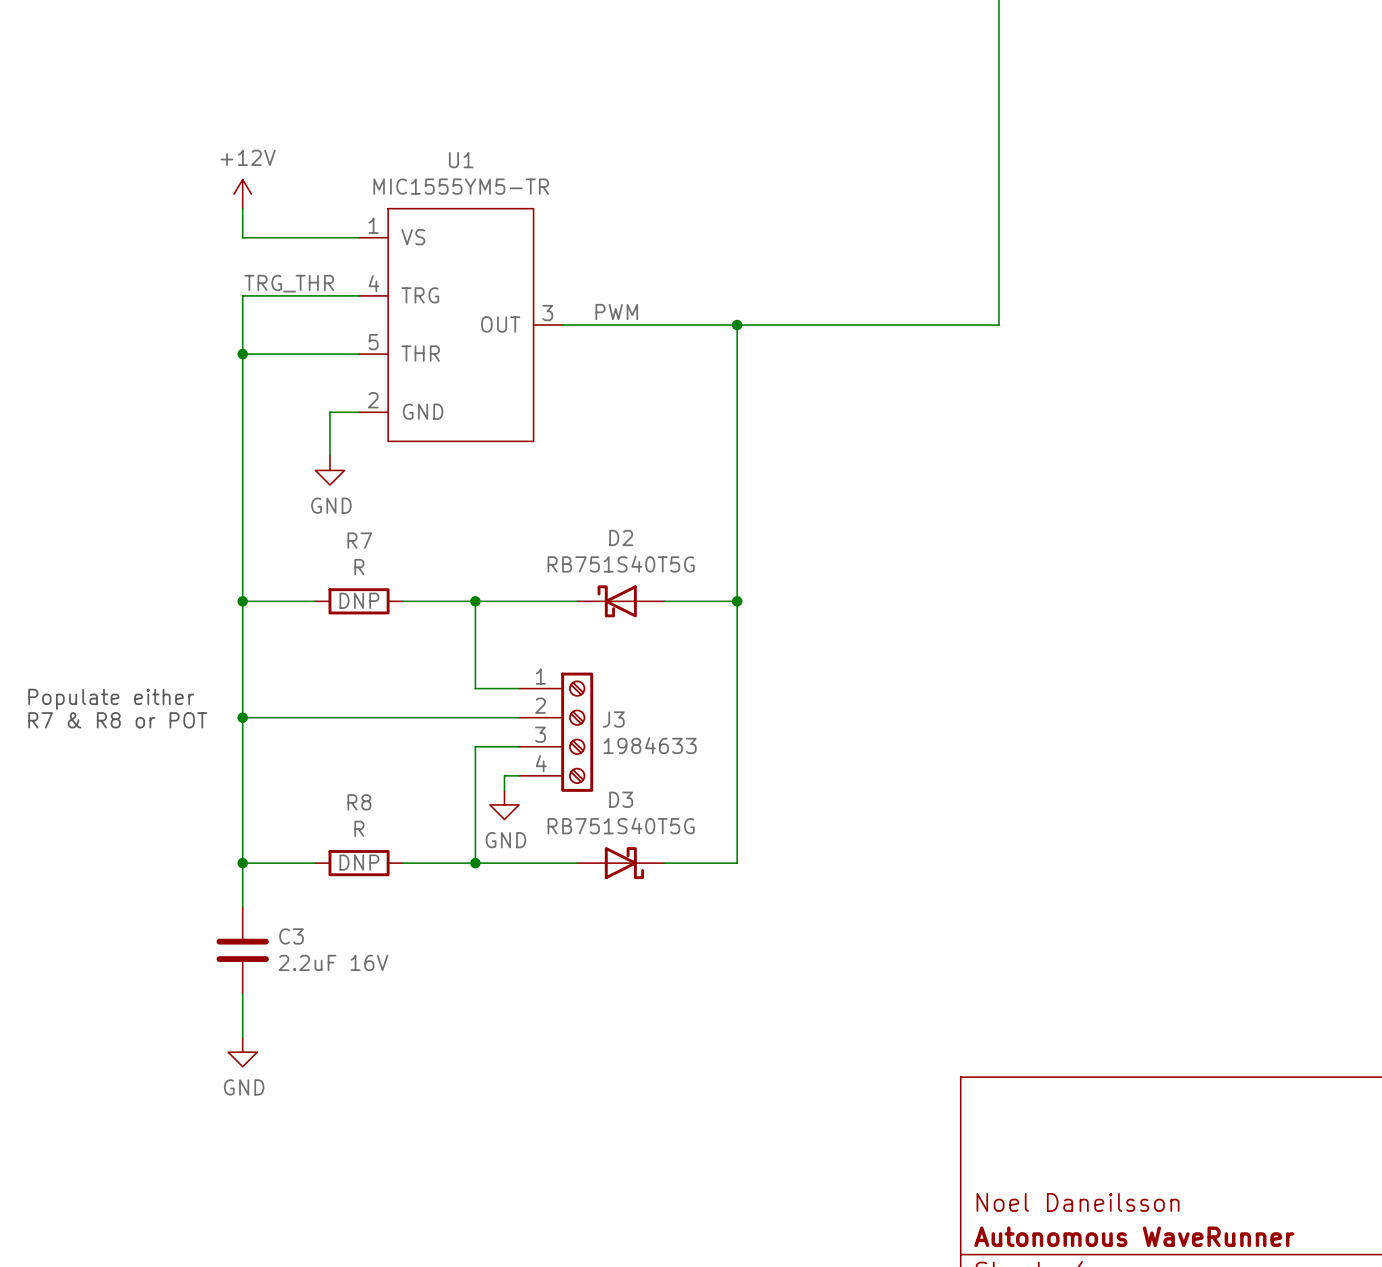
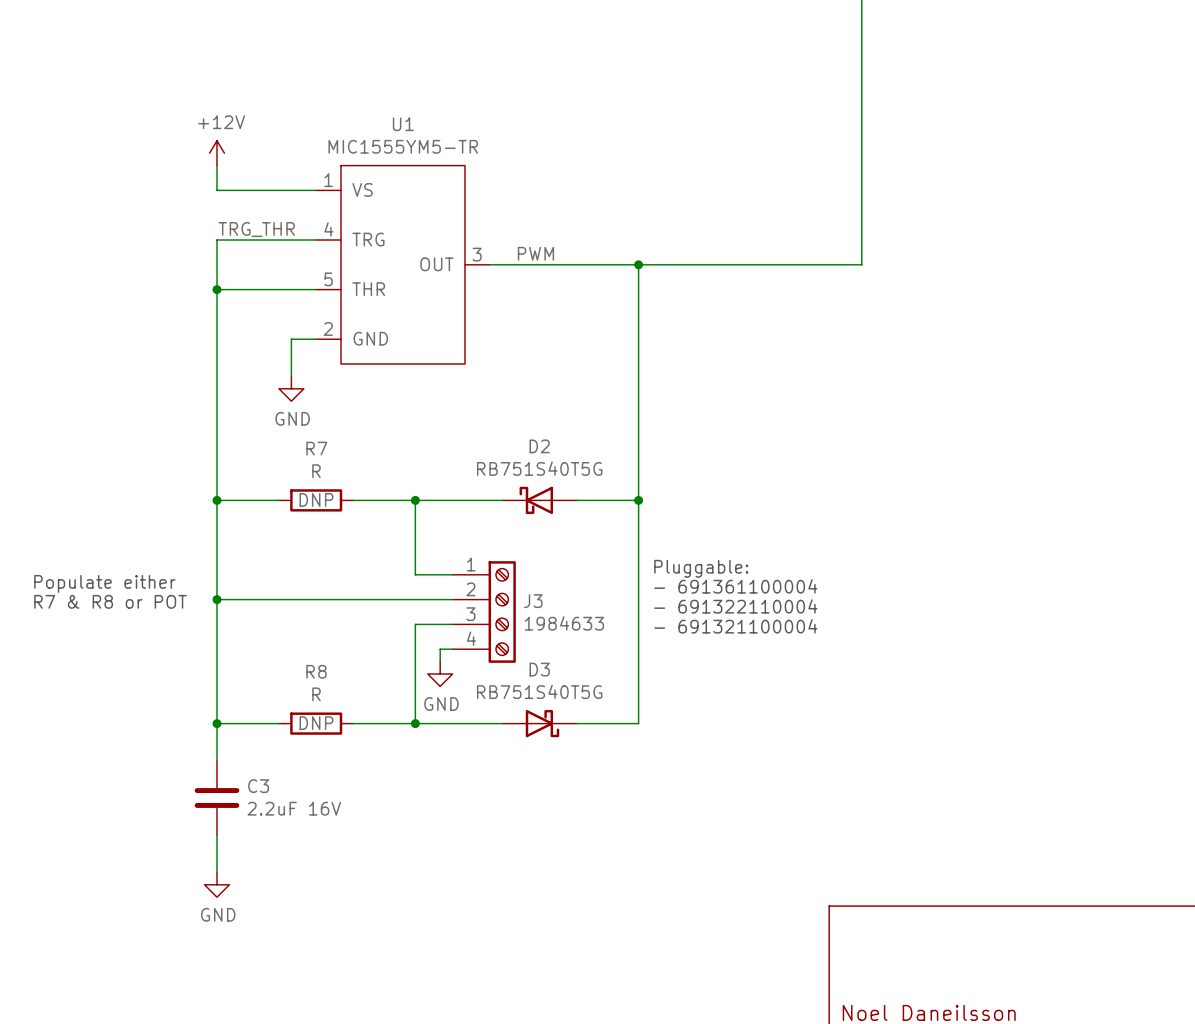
text: none -> Pluggable: (701, 568)
text: none -> - 691361100004 (735, 586)
text: none -> - 691322110004 (735, 606)
text: none -> - 691321100004 (735, 626)

